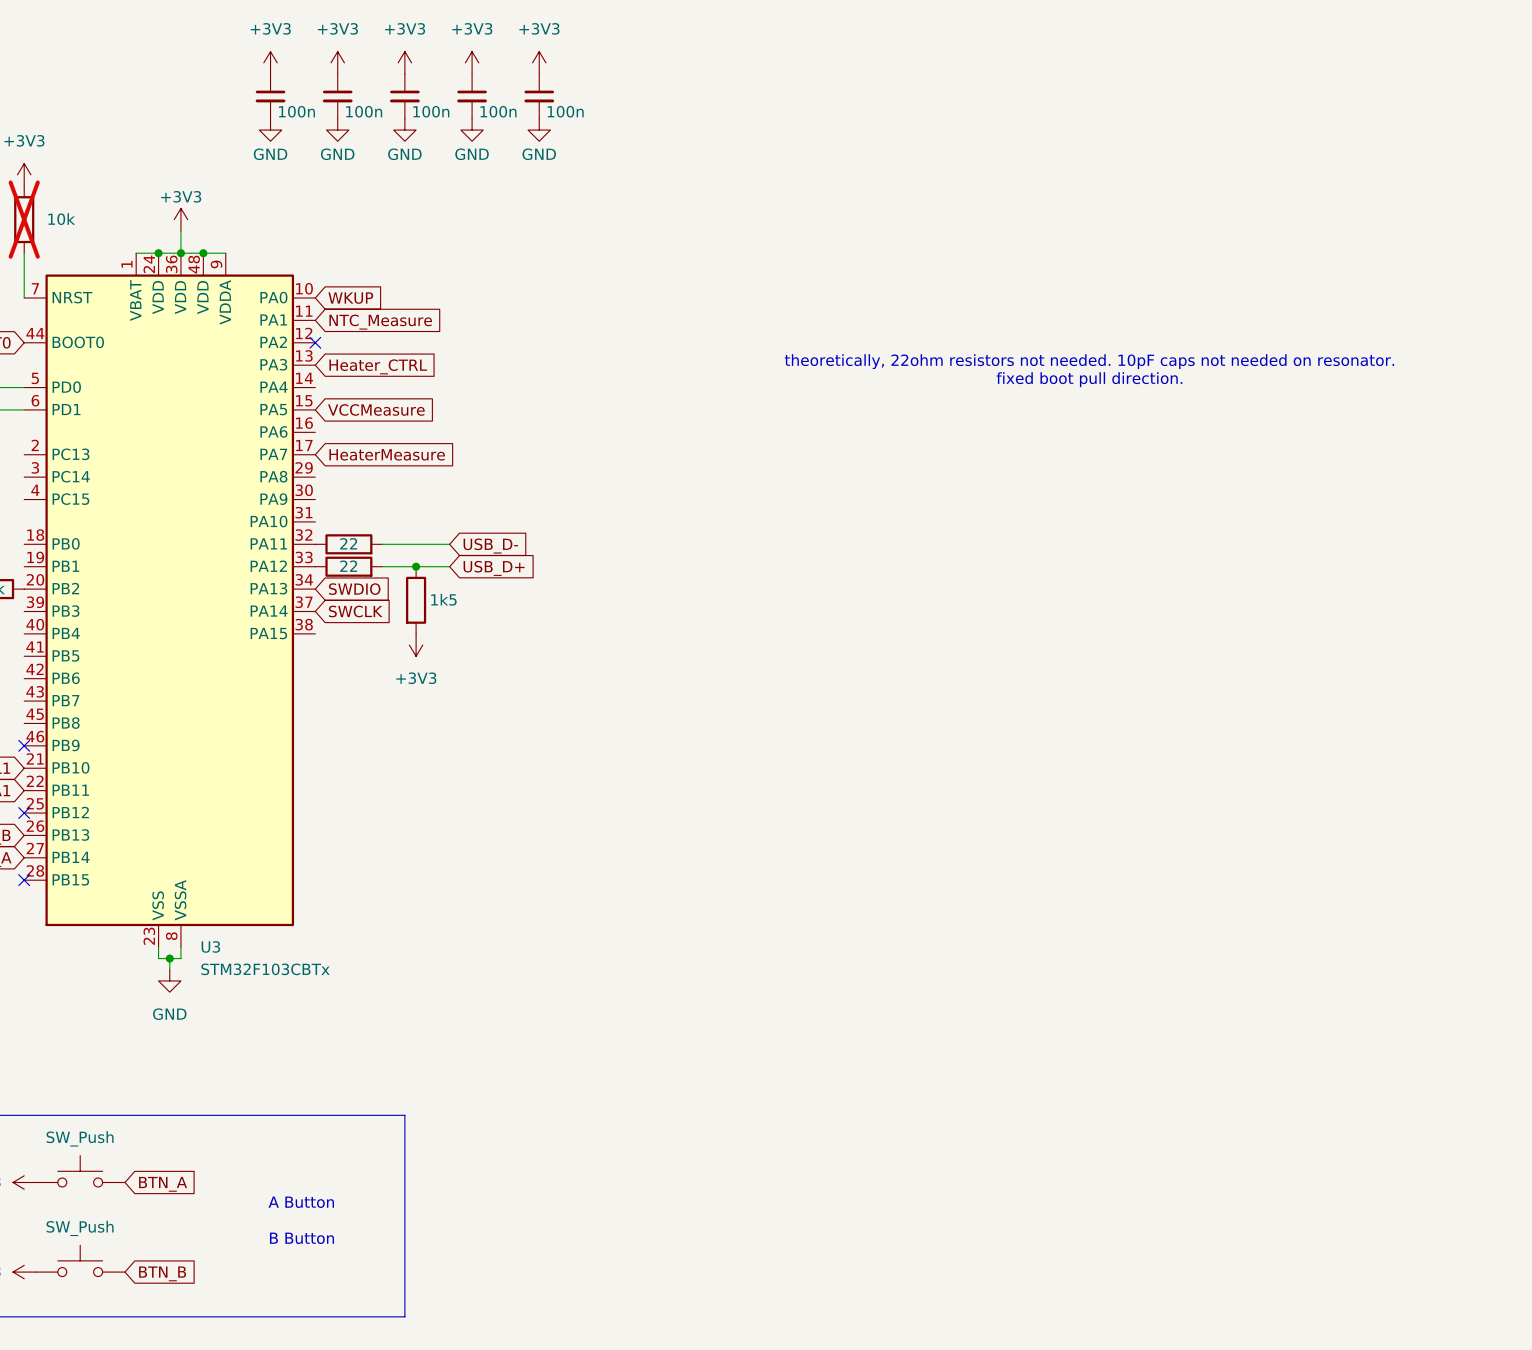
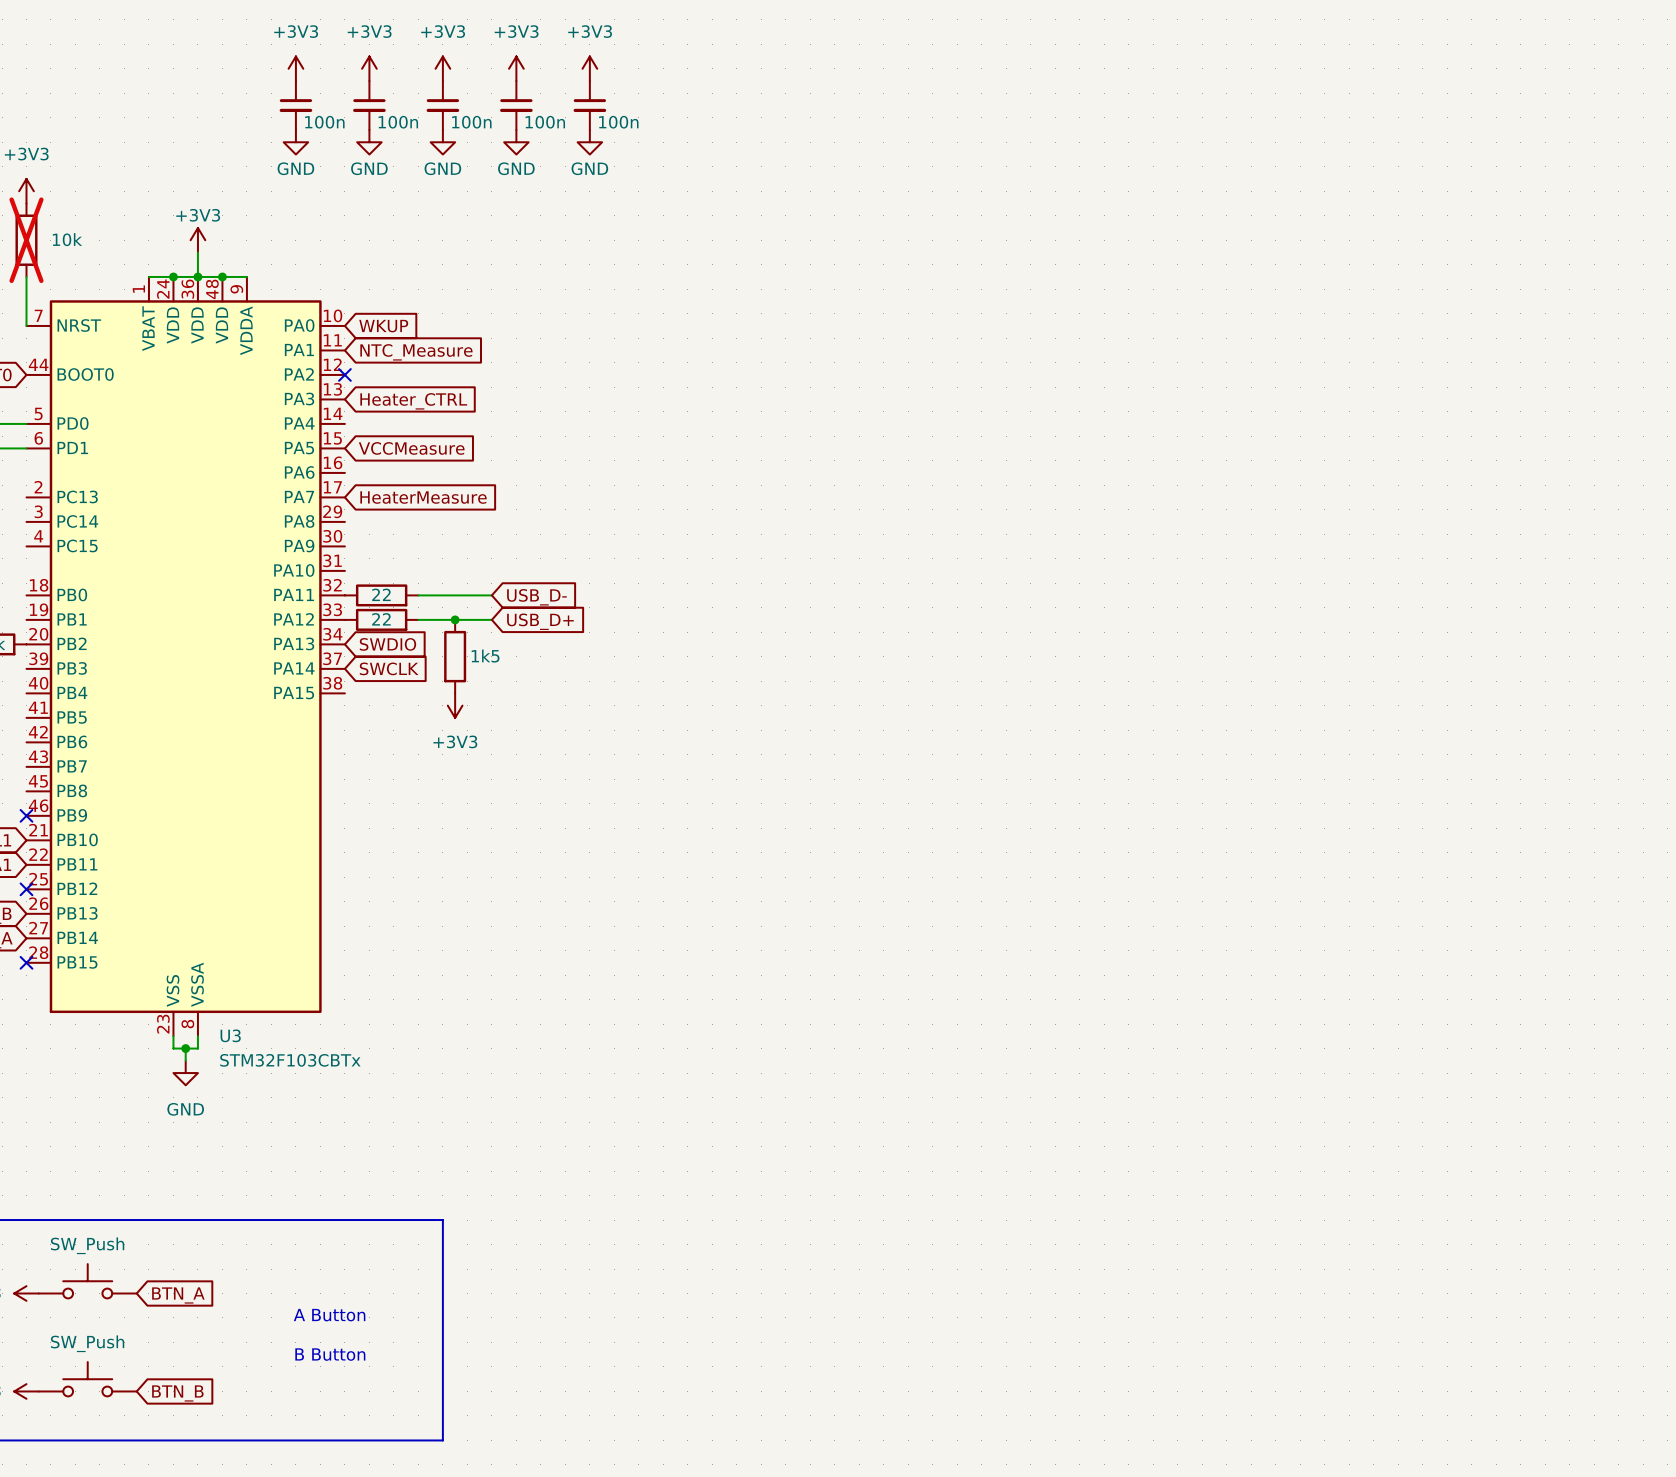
text: theoretically, 22ohm resistors not needed. 10pF caps not needed on resonator. (1089, 361) -> none
text: fixed boot pull direction. (1089, 379) -> none

